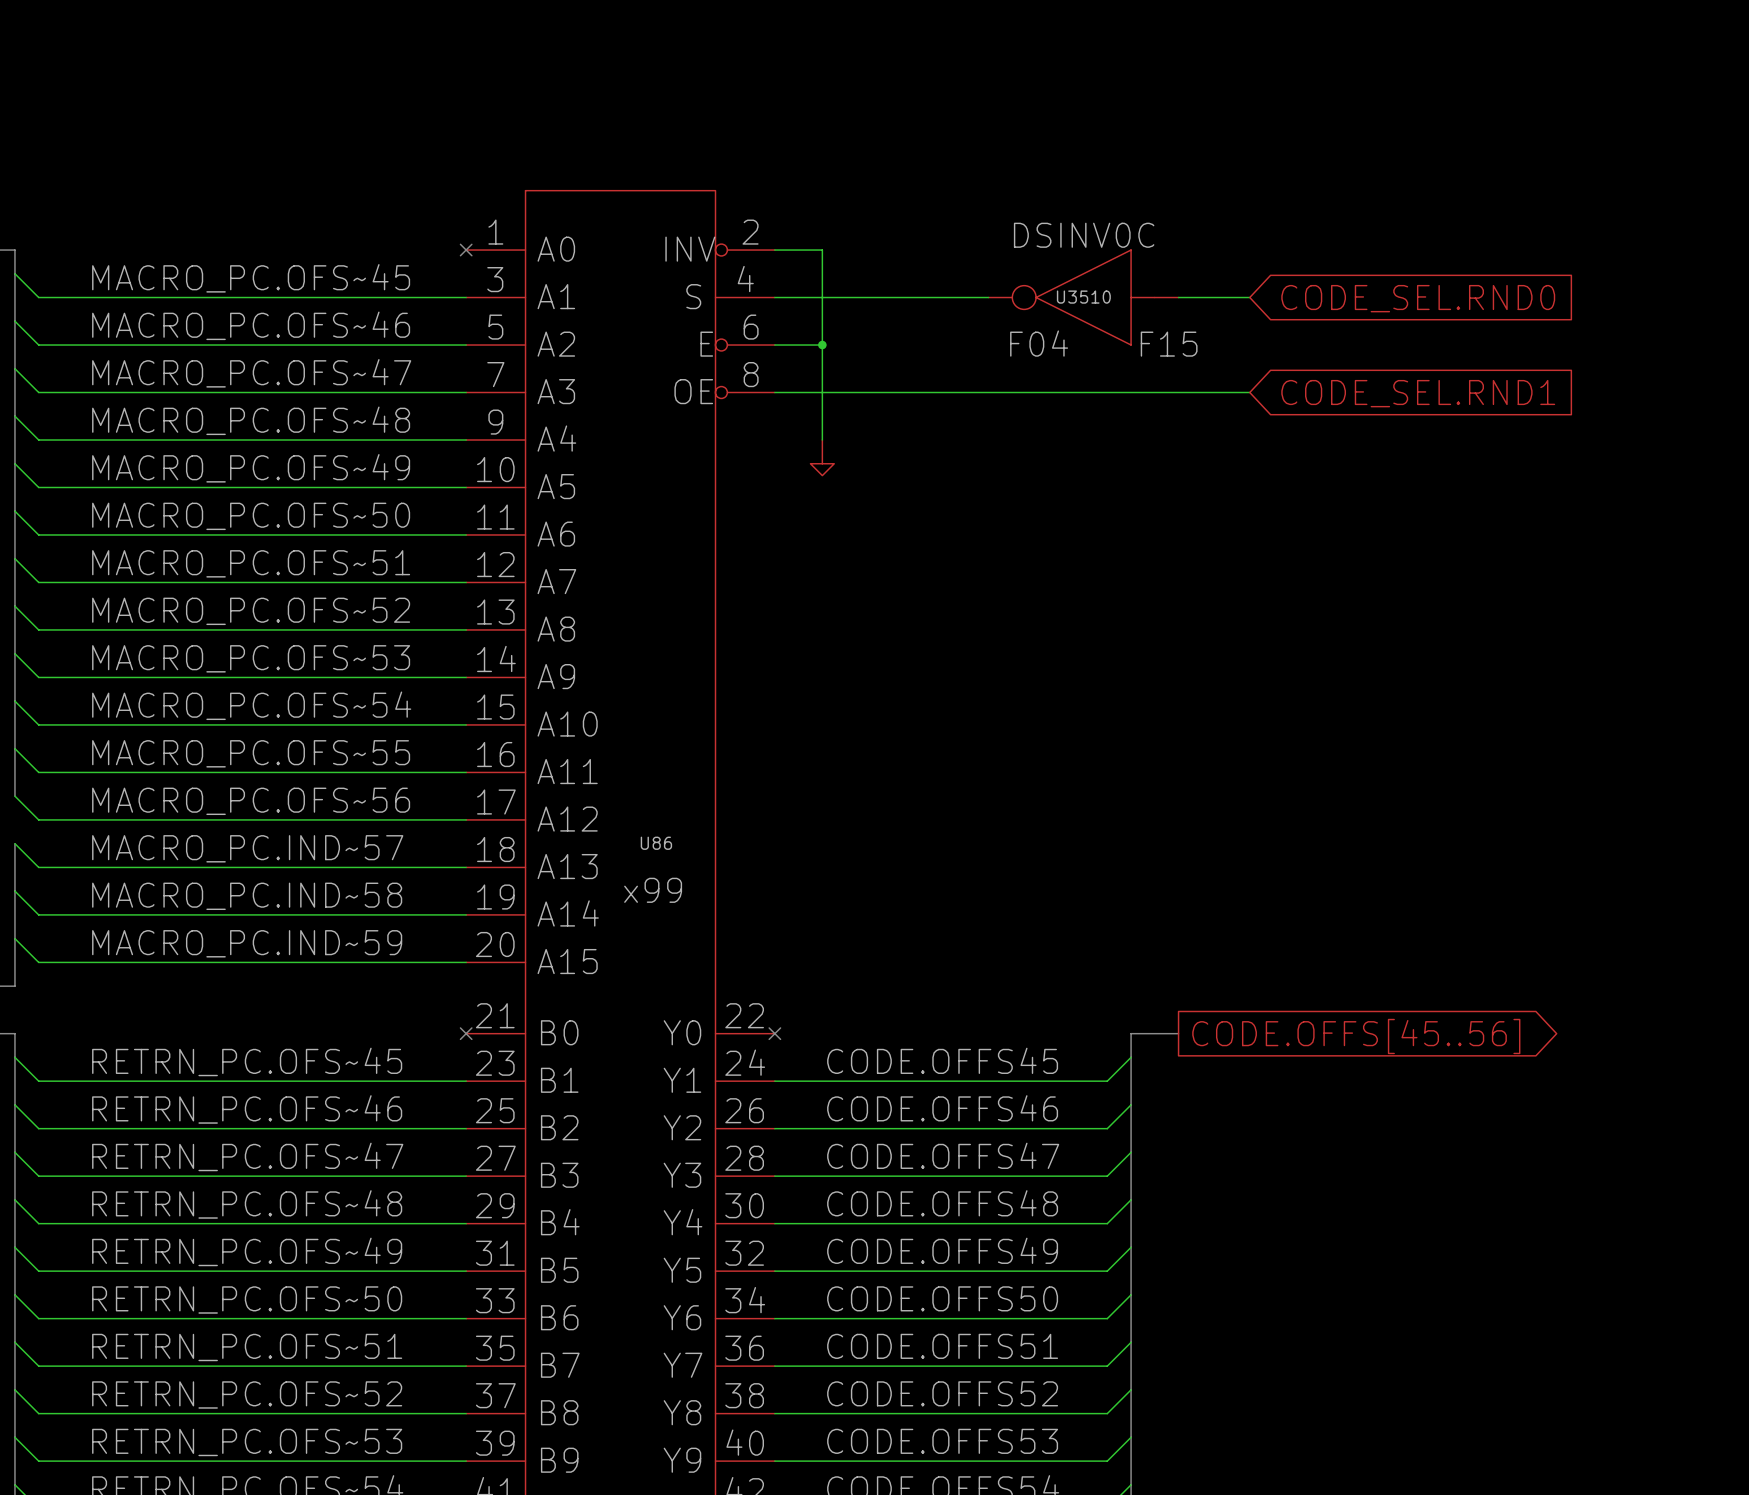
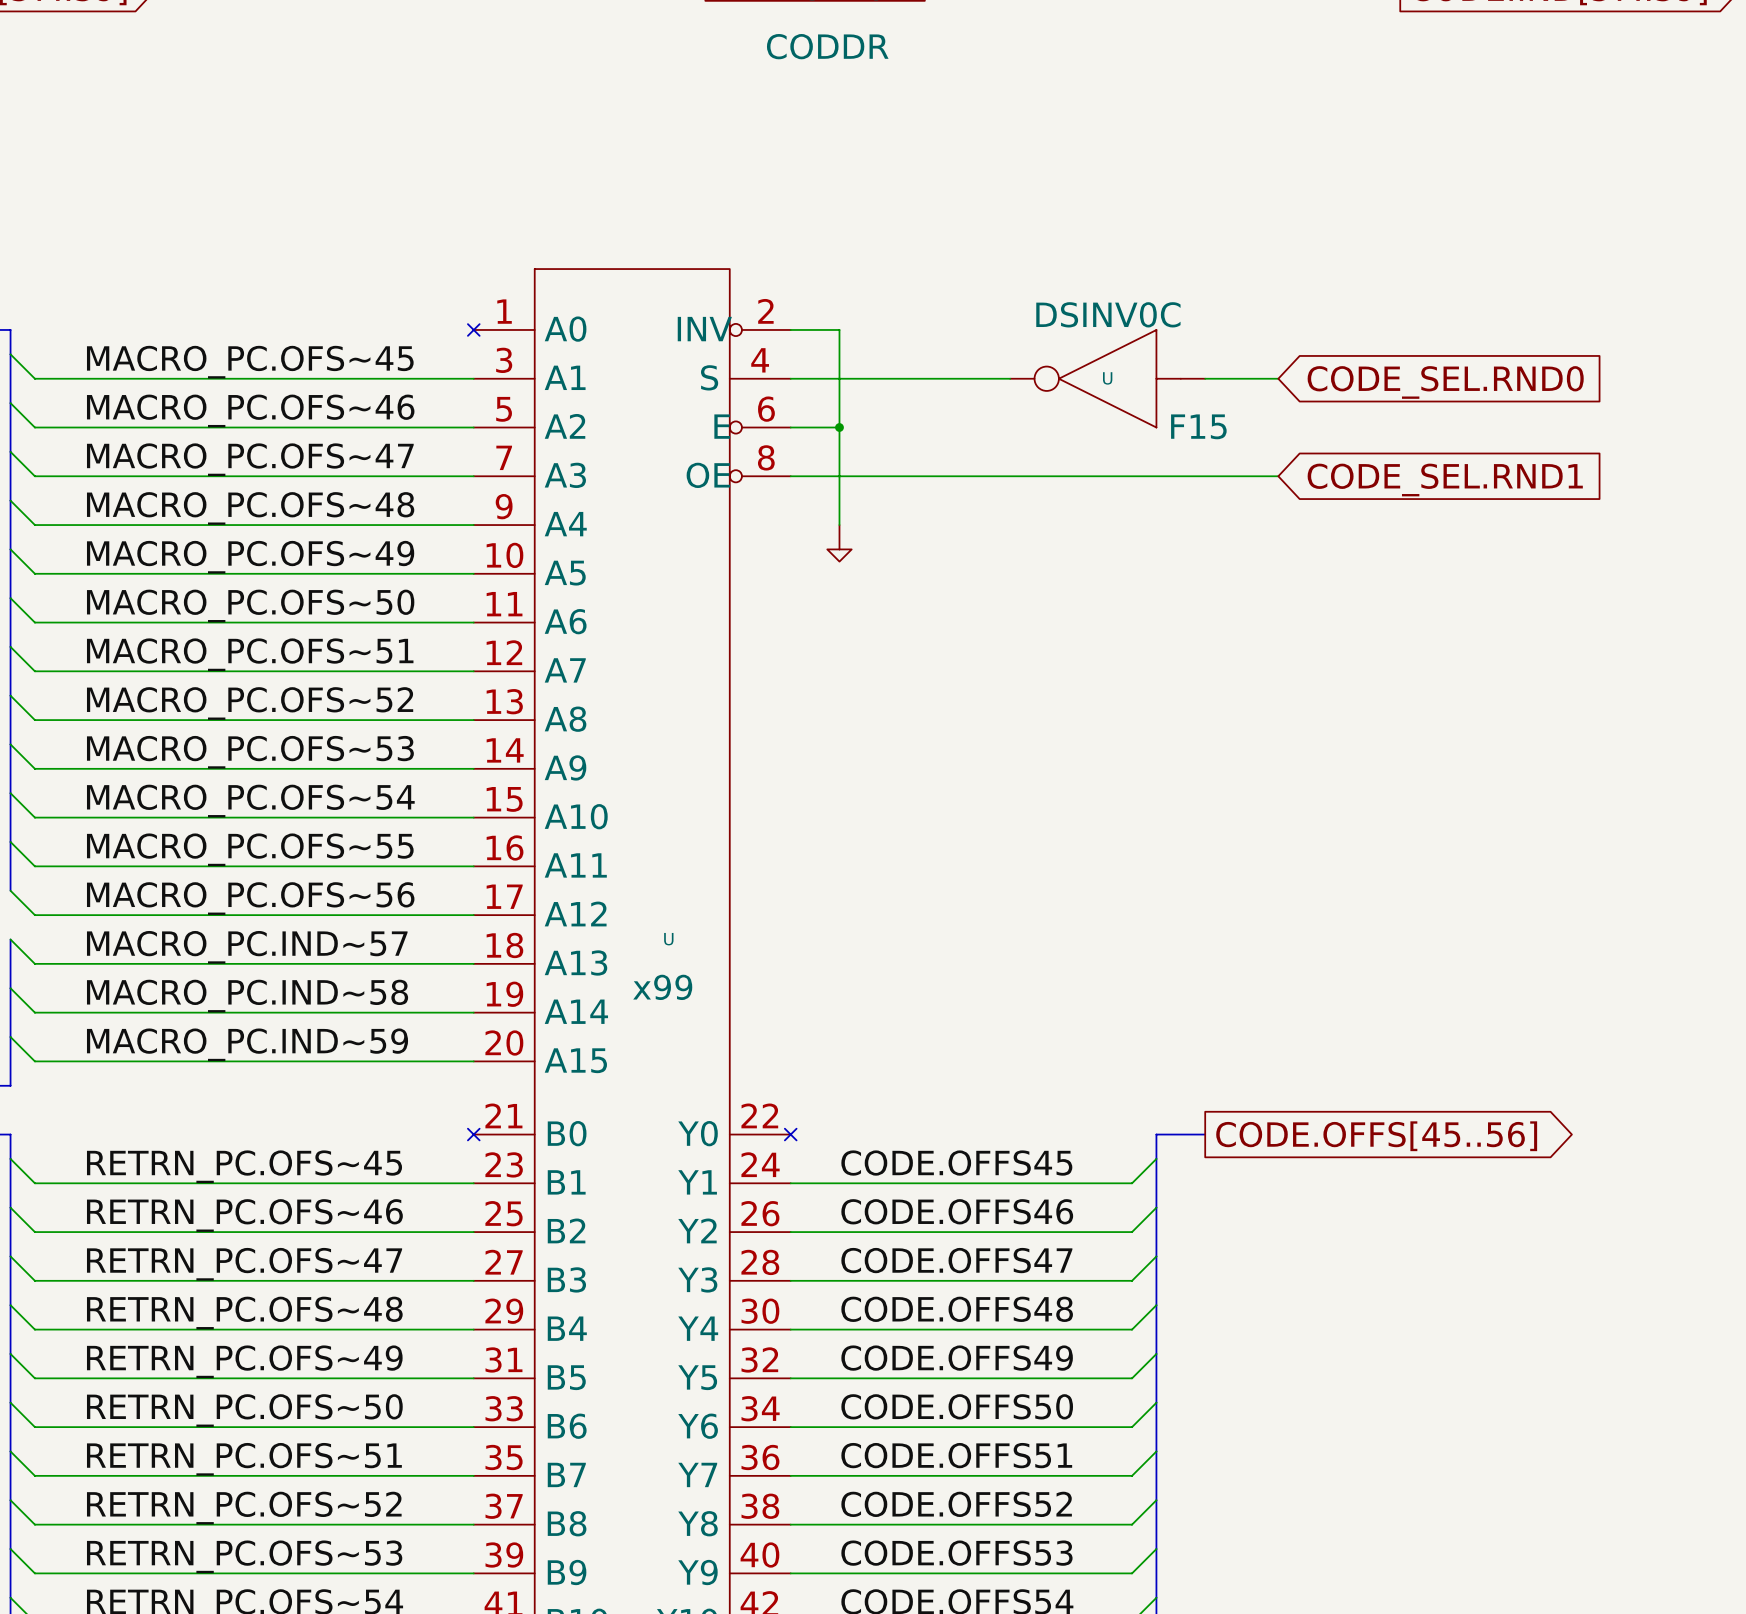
U3510 name: U3510 (1083, 297) -> U (1107, 378)
U3510 value: F04 (1039, 343) -> none
U86 name: U86 (656, 843) -> U (668, 939)

